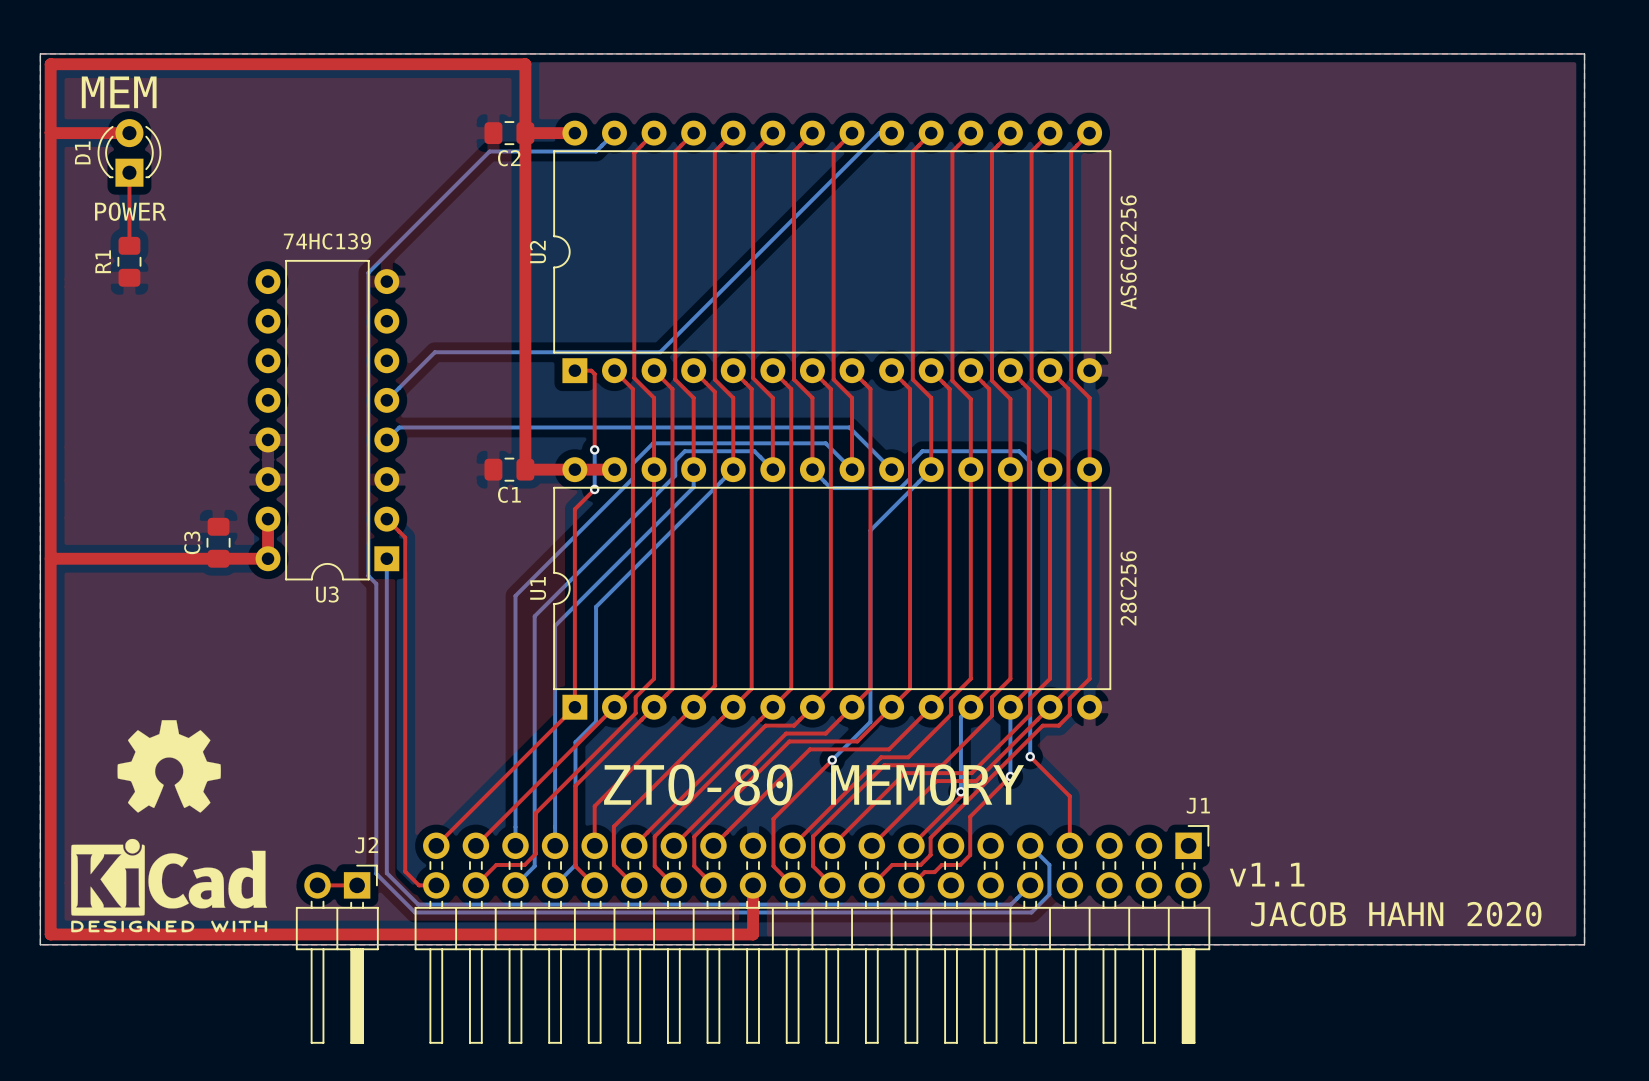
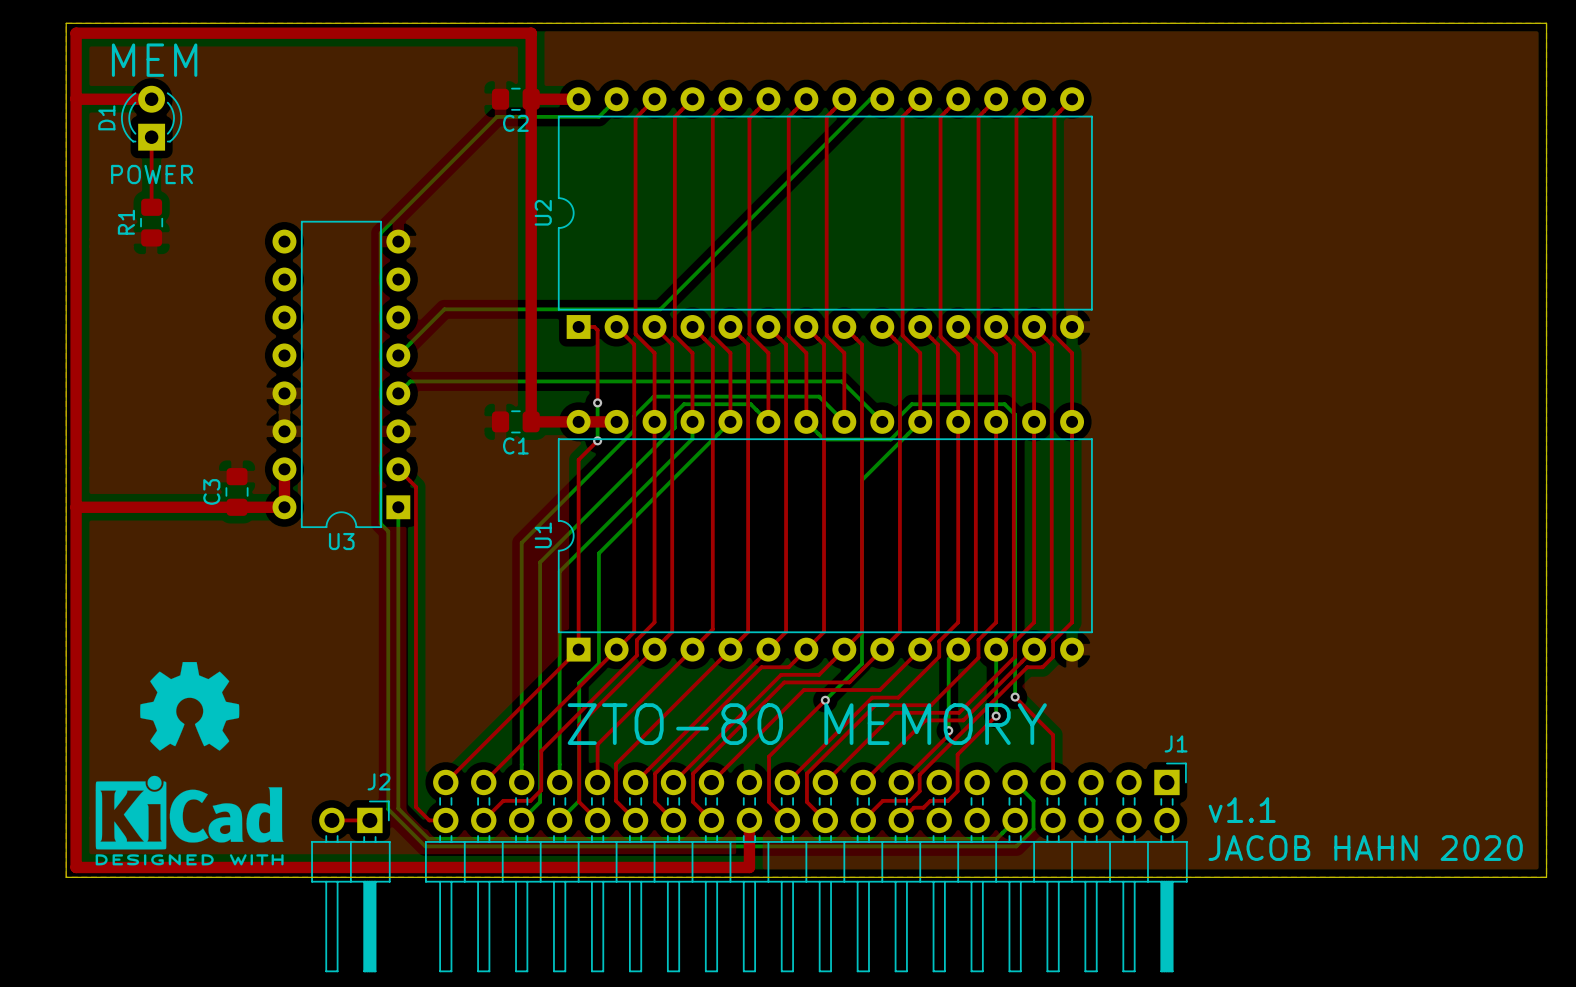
text: 74HC139 (327, 241) -> none
text: AS6C62256 (1128, 252) -> none
text: 28C256 (1128, 588) -> none

